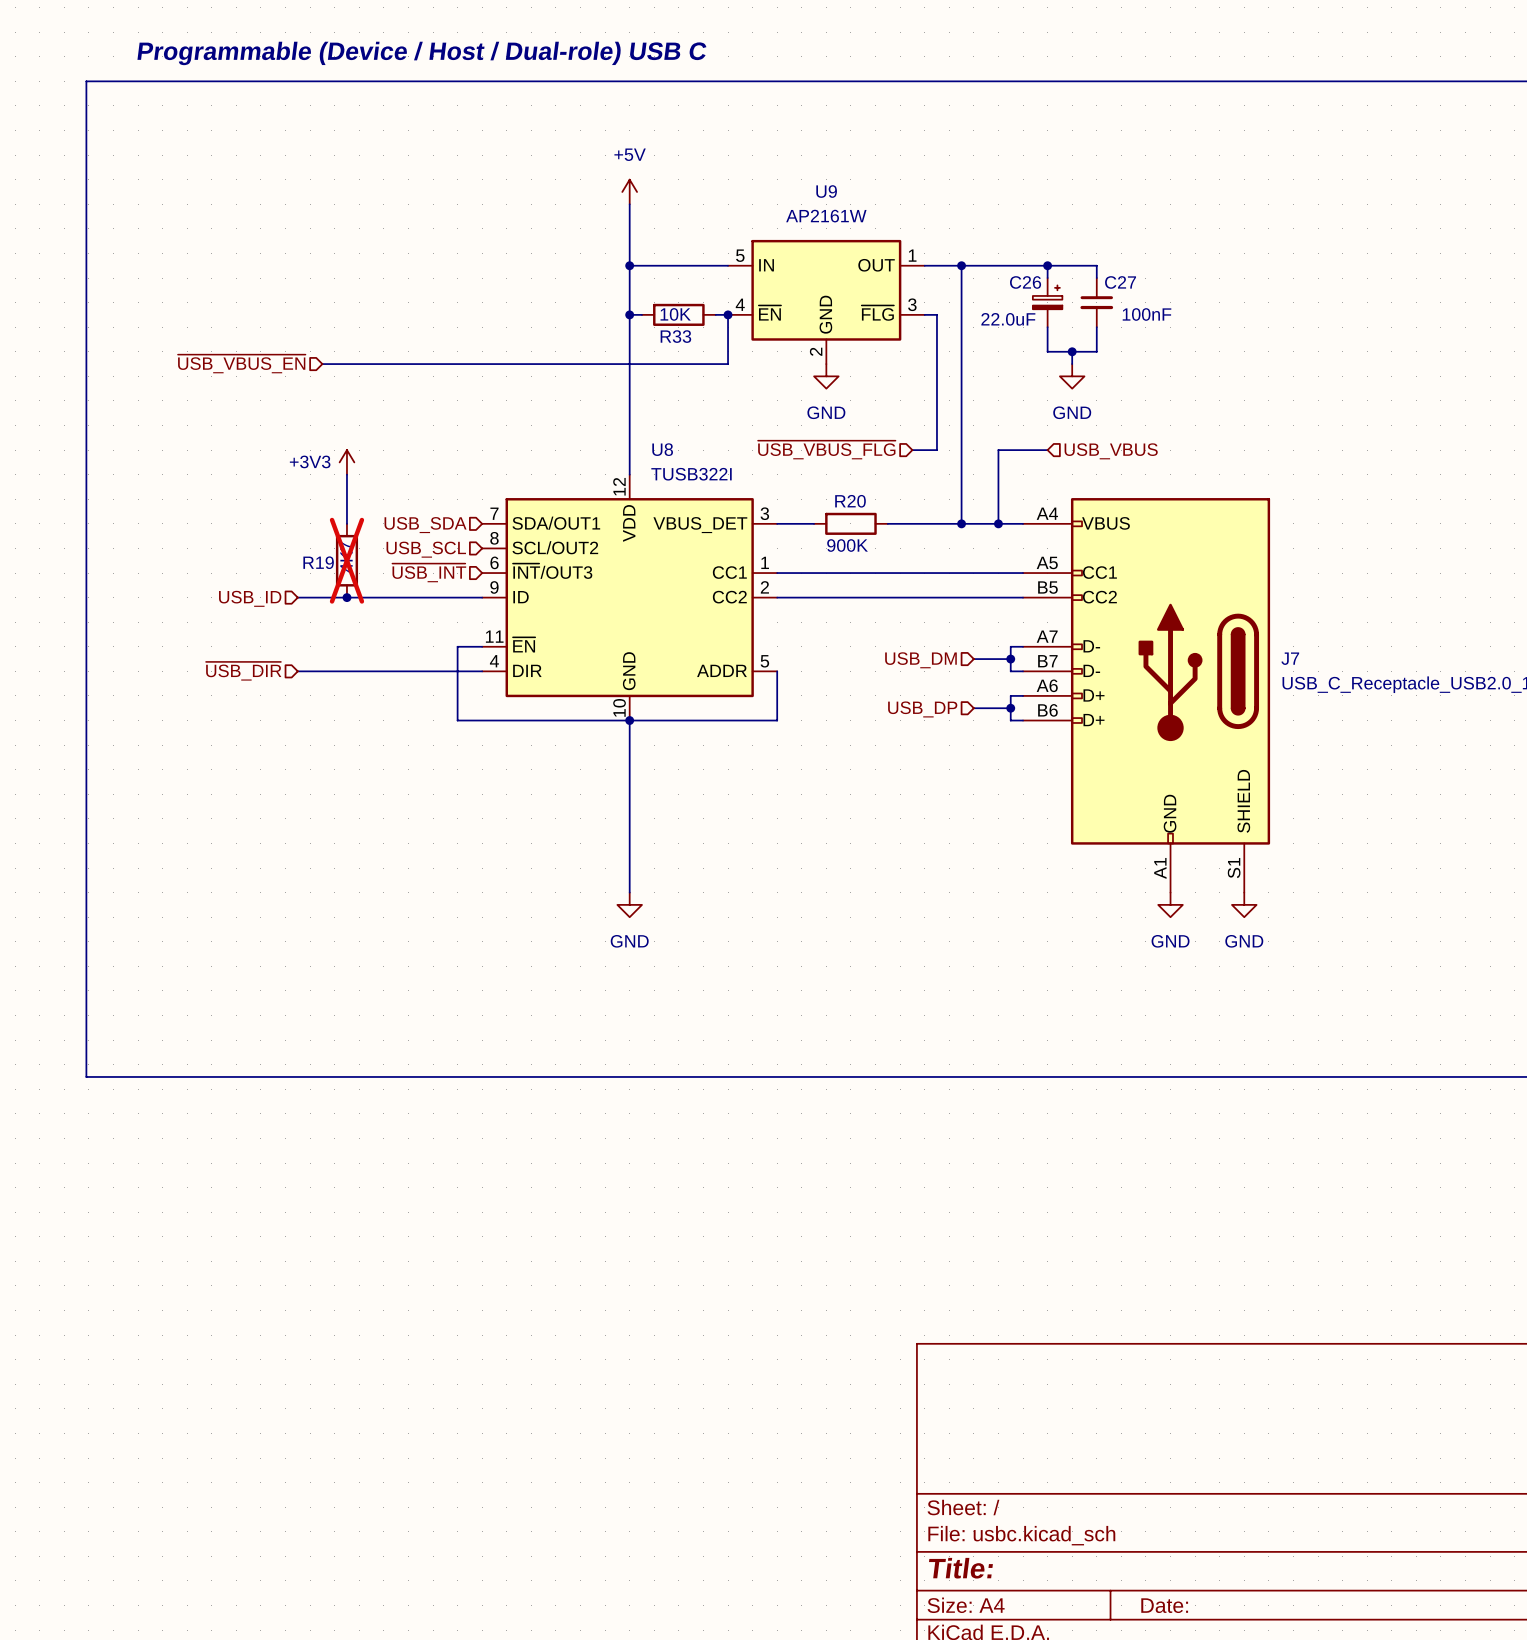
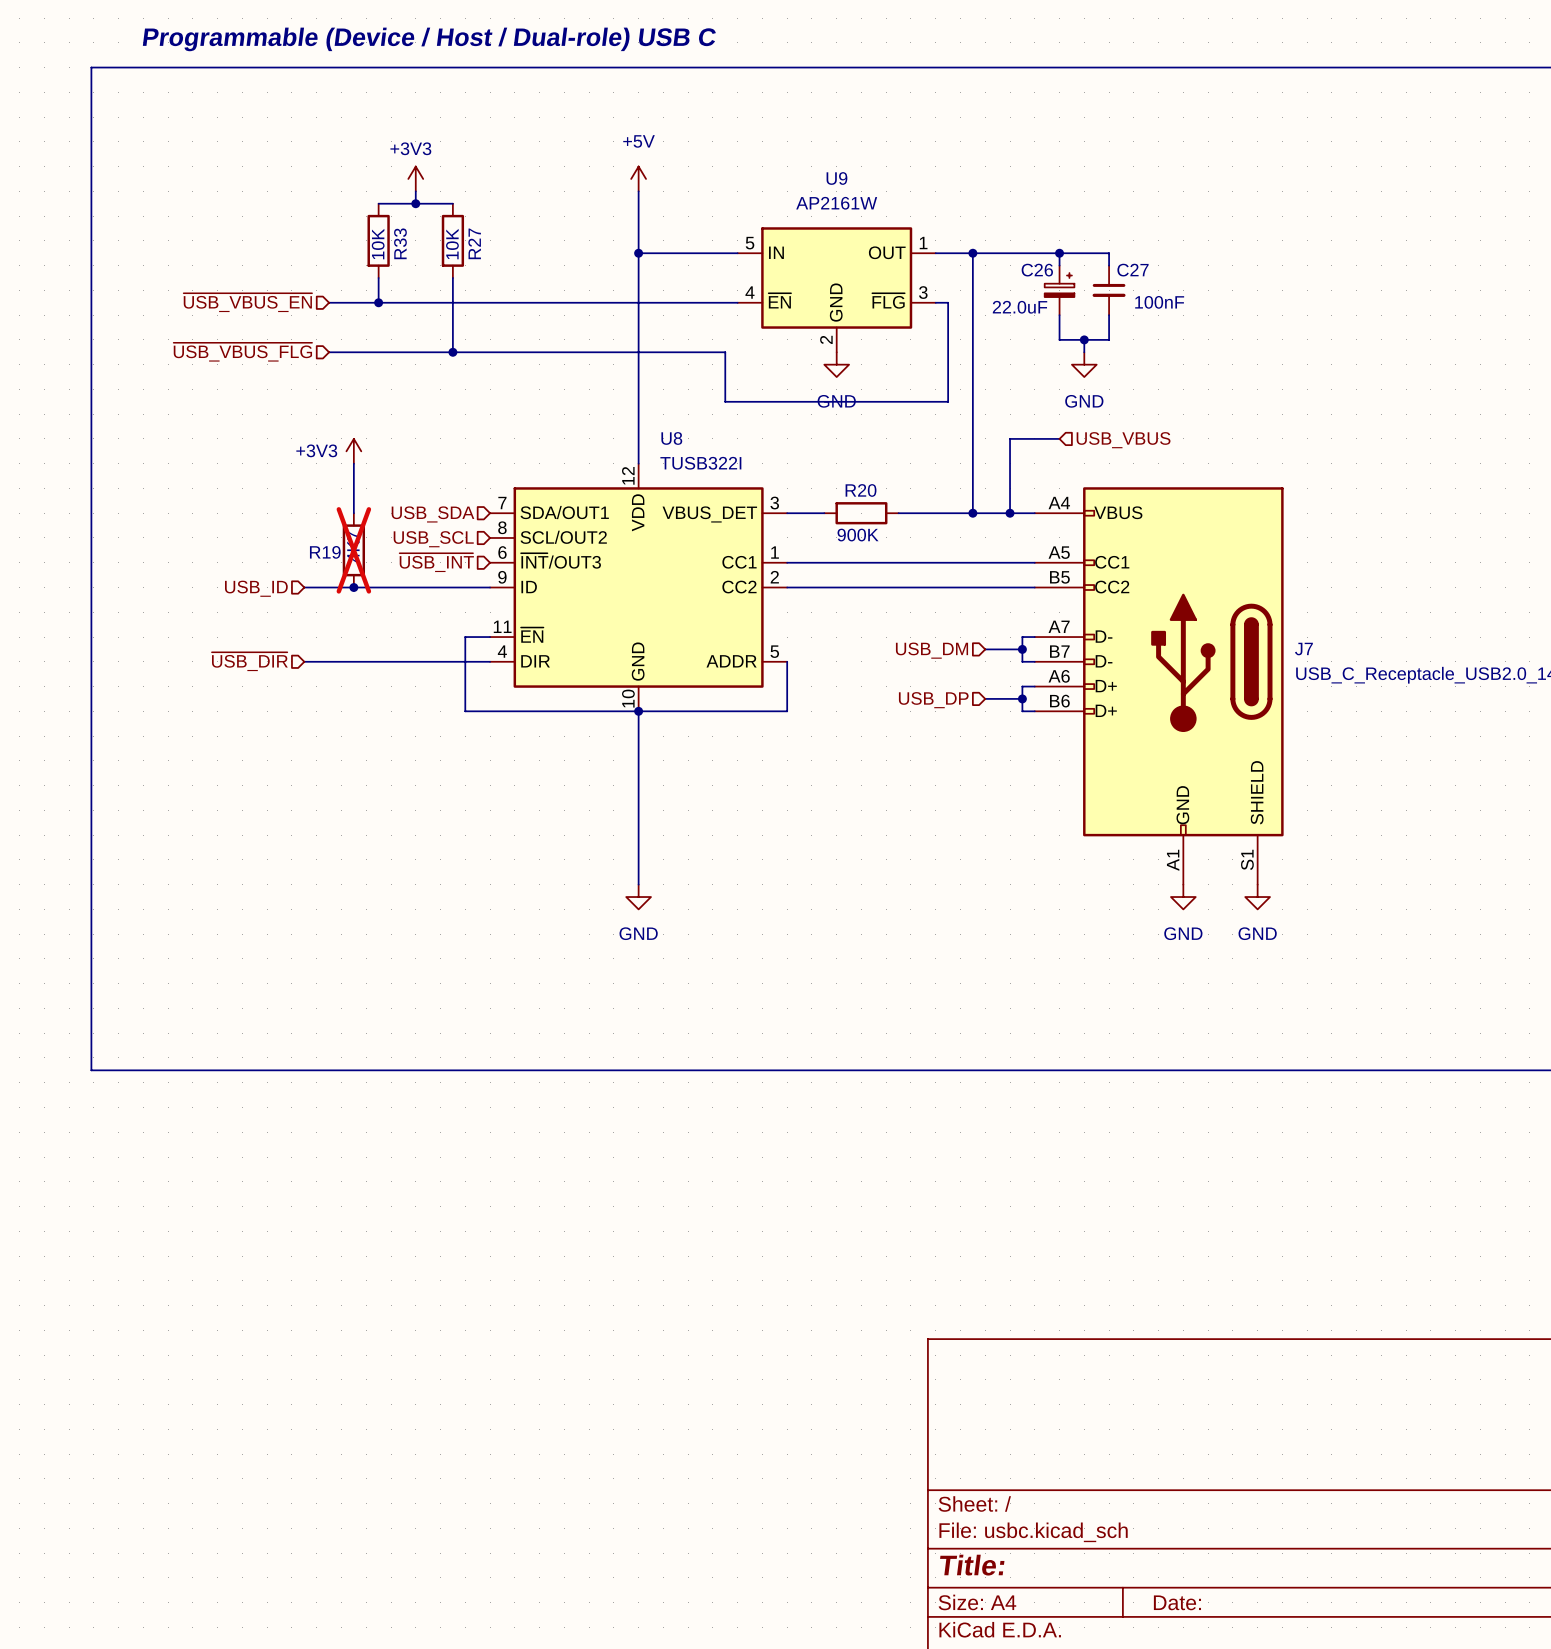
power symbol: none -> +3V3 (415, 178)
wire: none -> (415, 191) (415, 203)
wire: none -> (378, 203) (452, 203)
junction: none -> (415, 203)
R27: none -> 10K (452, 240)
wire: none -> (378, 278) (378, 302)
wire: none -> (452, 278) (452, 352)
hierarchical label: none -> ~{USB_VBUS_EN} (247, 302)
wire: none -> (329, 302) (638, 302)
junction: none -> (378, 302)
junction: (629, 314) -> none
wire: none -> (650, 302) (725, 302)
R33 rotation: 0° (678, 314) -> 90° clockwise (378, 240)
R33 position: (678, 314) -> (378, 240)
wire: (728, 314) (728, 364) (715, 364) -> none
junction: (728, 314) -> none
R33 name position: R33 (675, 336) -> R33 (400, 243)
hierarchical label: ~{USB_VBUS_EN} (241, 363) -> ~{USB_VBUS_FLG} (242, 352)
junction: none -> (452, 352)
wire: (936, 413) (936, 450) (912, 450) -> (948, 401) (725, 401) (725, 352)
hierarchical label: ~{USB_VBUS_FLG} (826, 450) -> none

